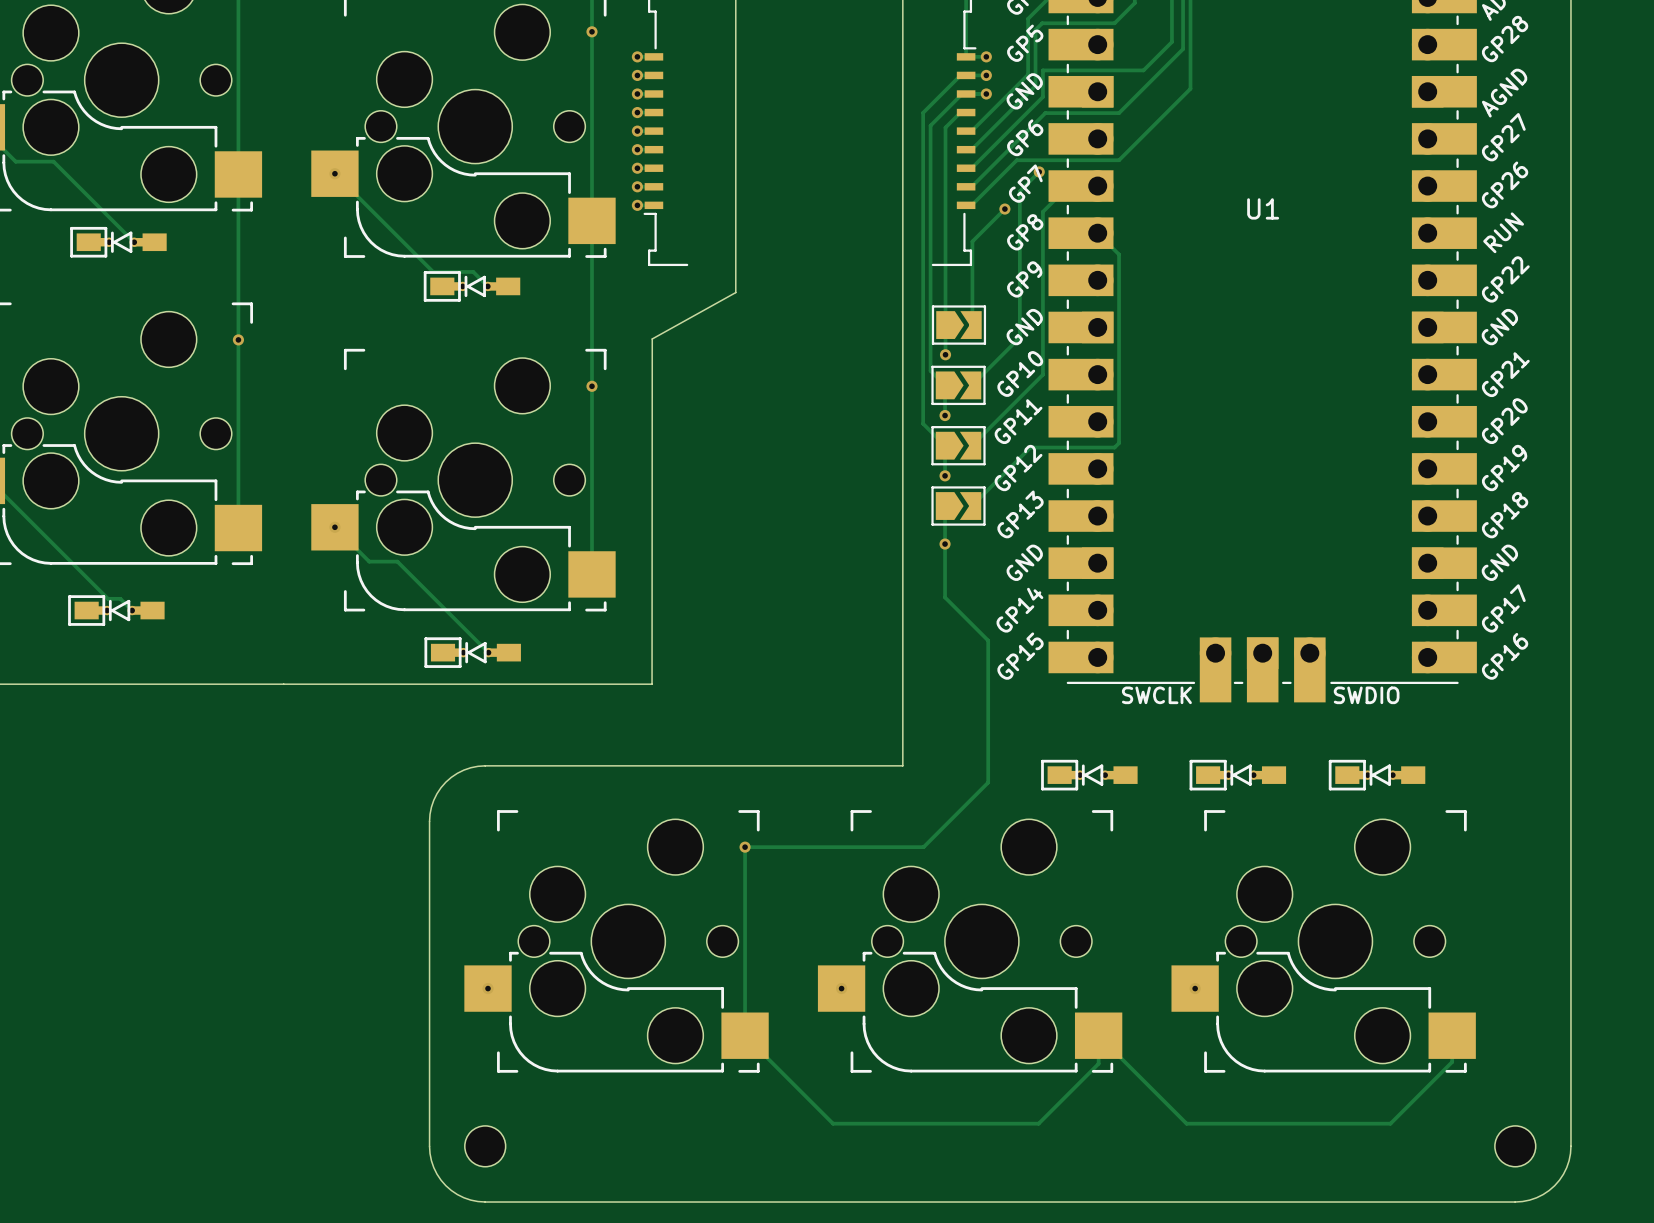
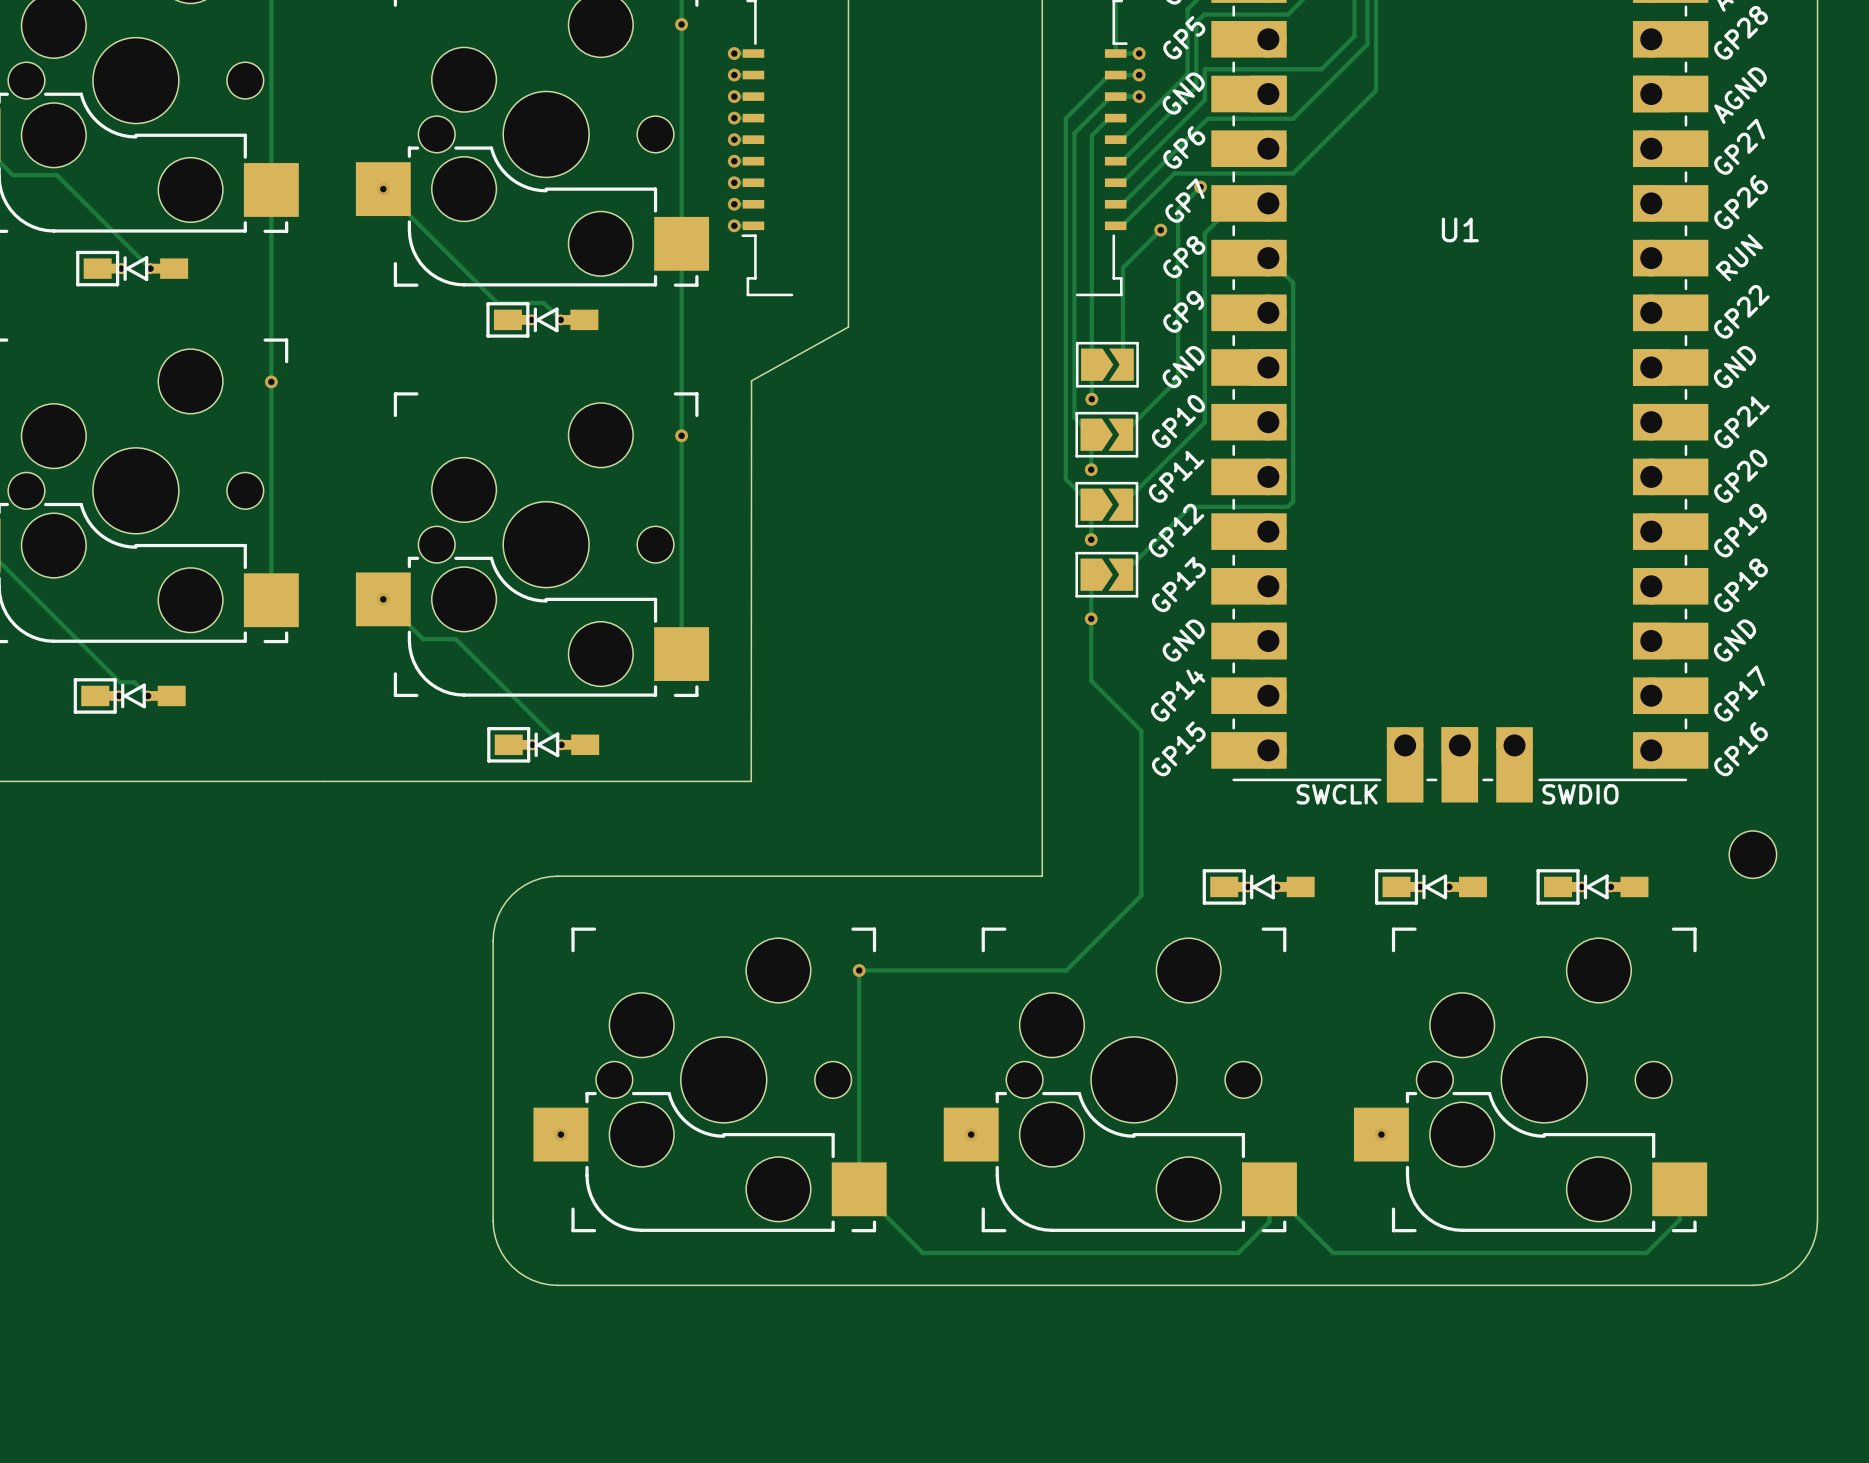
board edge: (429, 1062) (429, 1146) (433, 1167) (441, 1180) (457, 1194) (470, 1200) (485, 1202) (1522, 1201) (1536, 1197) (1549, 1190) (1559, 1180) (1566, 1167) (1570, 1146) (1570, 1062) -> (493, 1220) (498, 1245) (512, 1266) (532, 1280) (557, 1285) (1752, 1285) (1777, 1280) (1798, 1266) (1812, 1245) (1817, 1220)
track: (800, 1090) (833, 1123) (1038, 1123) (1071, 1090) -> (922, 1253) (1238, 1253)
track: (1153, 1090) (1186, 1123) (1390, 1123) (1423, 1090) -> (1333, 1253) (1646, 1253)
part: (485, 1146) -> none
part position: (1515, 1146) -> (1752, 854)

